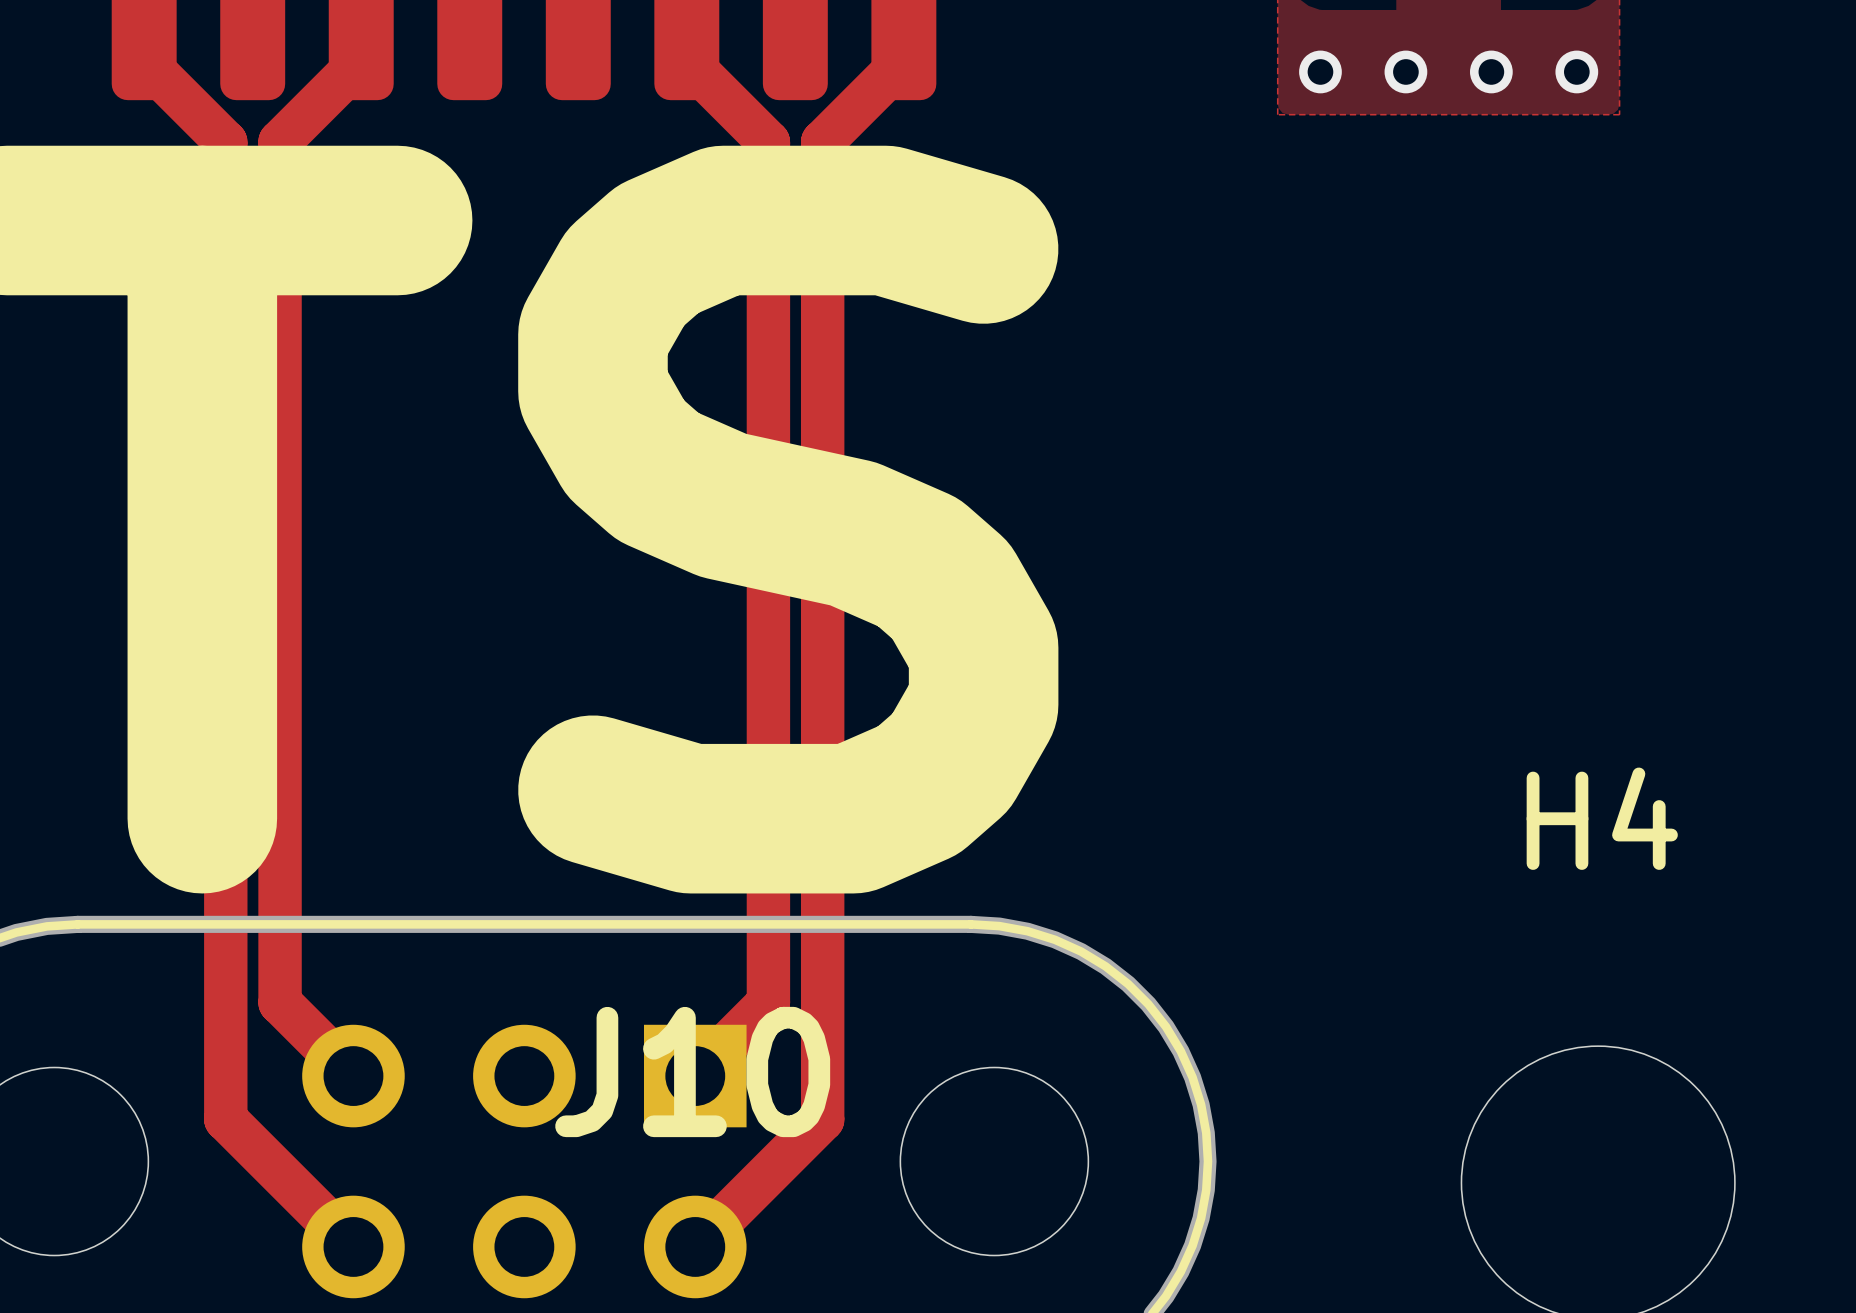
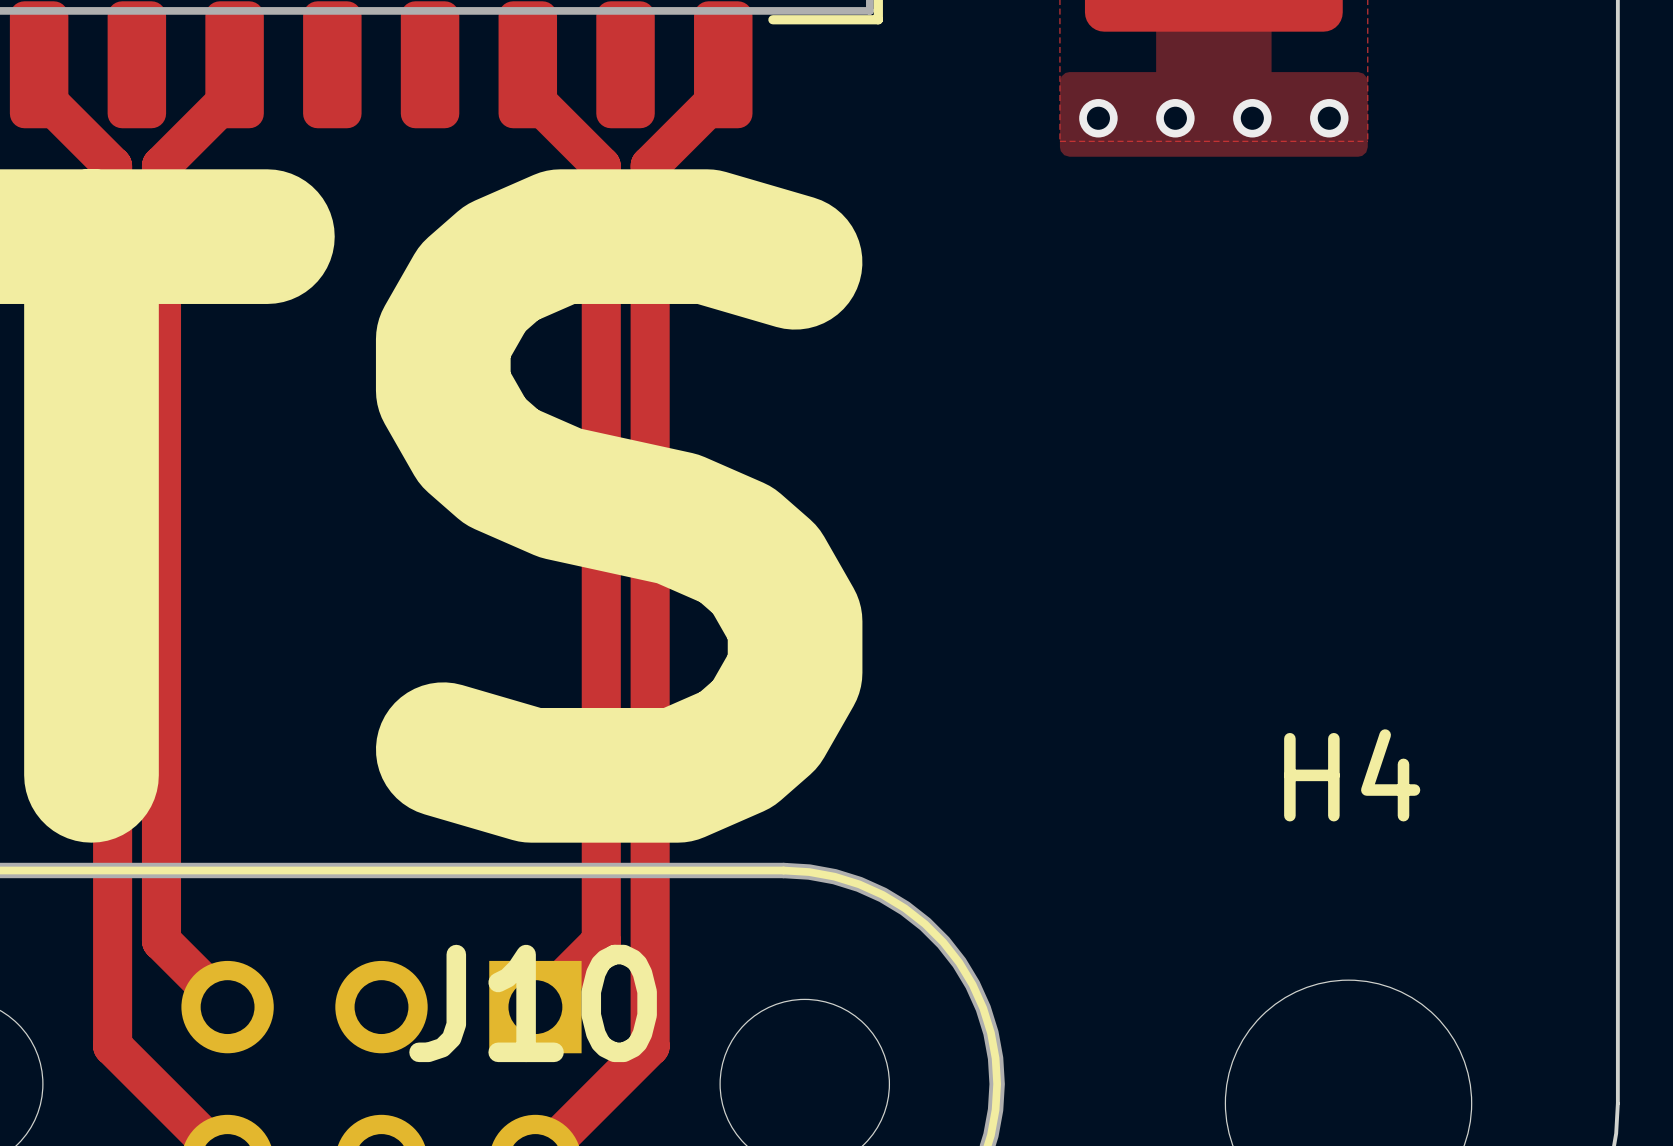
via position: (1320, 71) -> (1098, 118)
via position: (1405, 71) -> (1175, 118)
via position: (1491, 71) -> (1252, 118)
via position: (1576, 71) -> (1329, 118)

